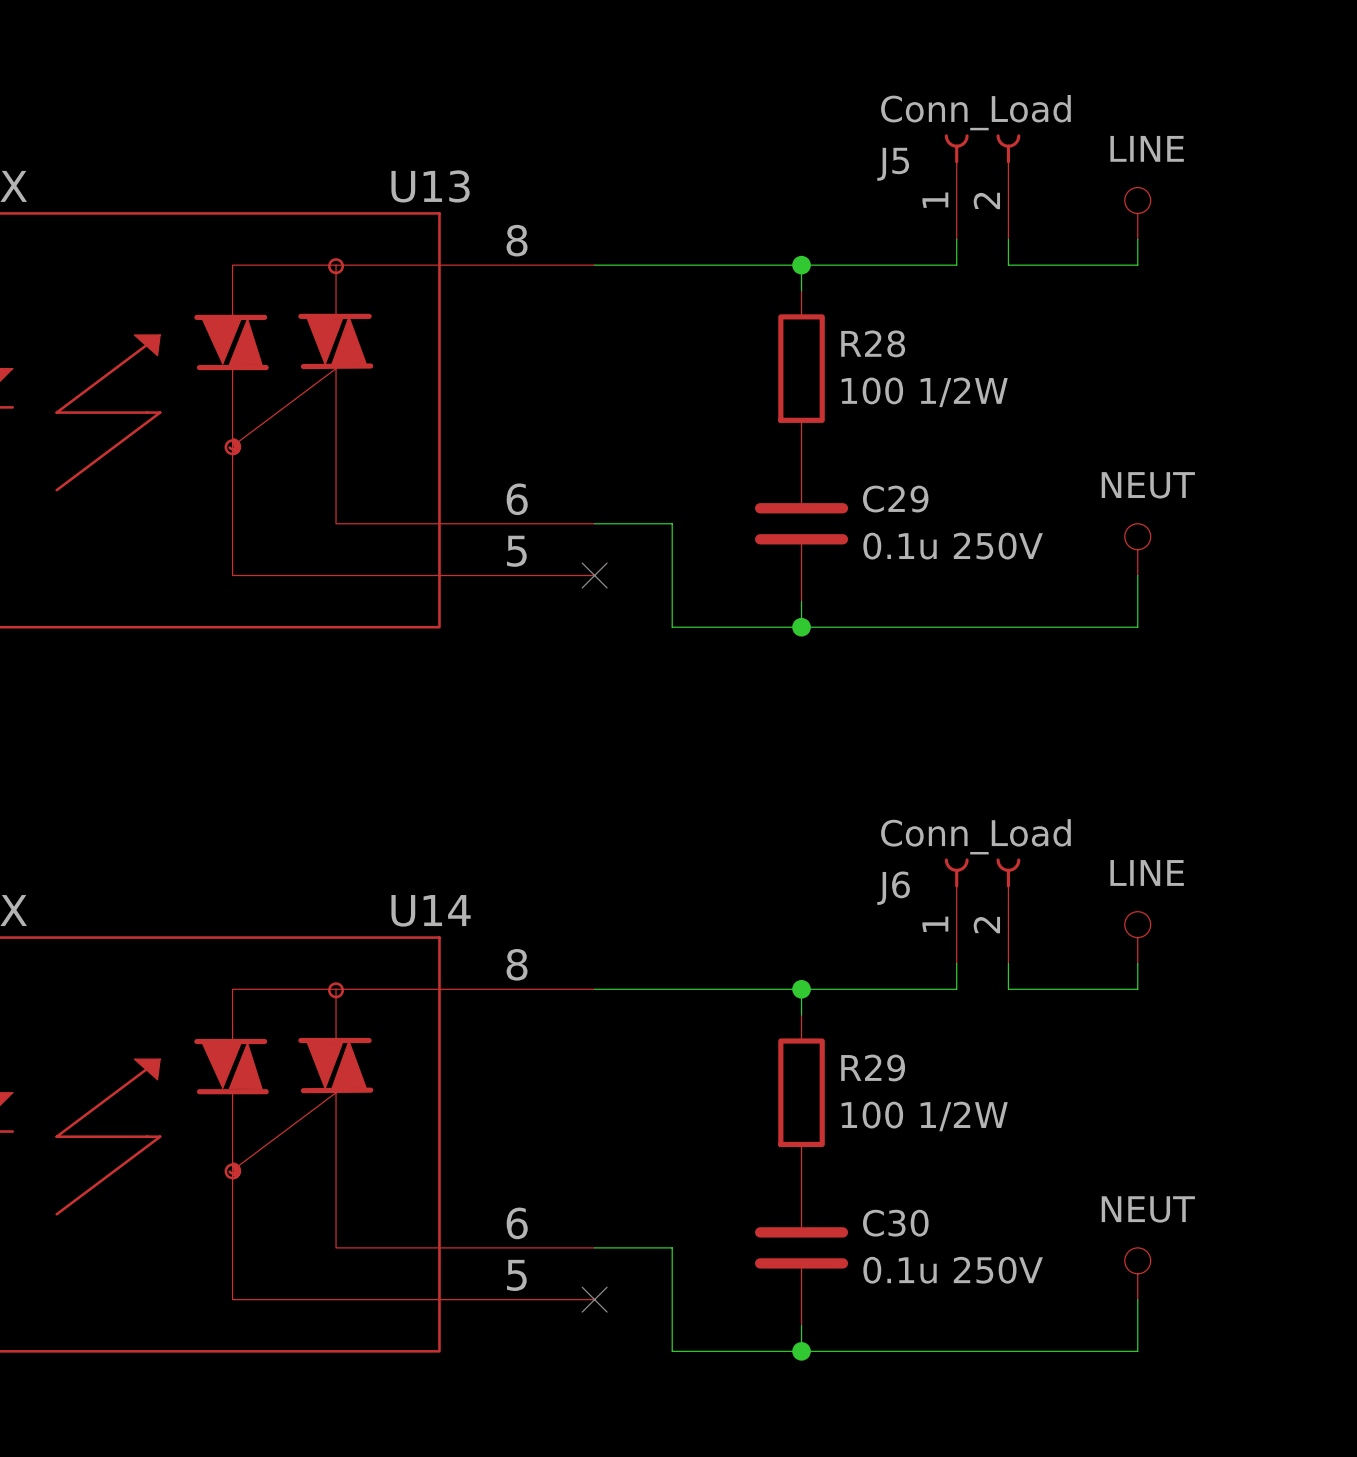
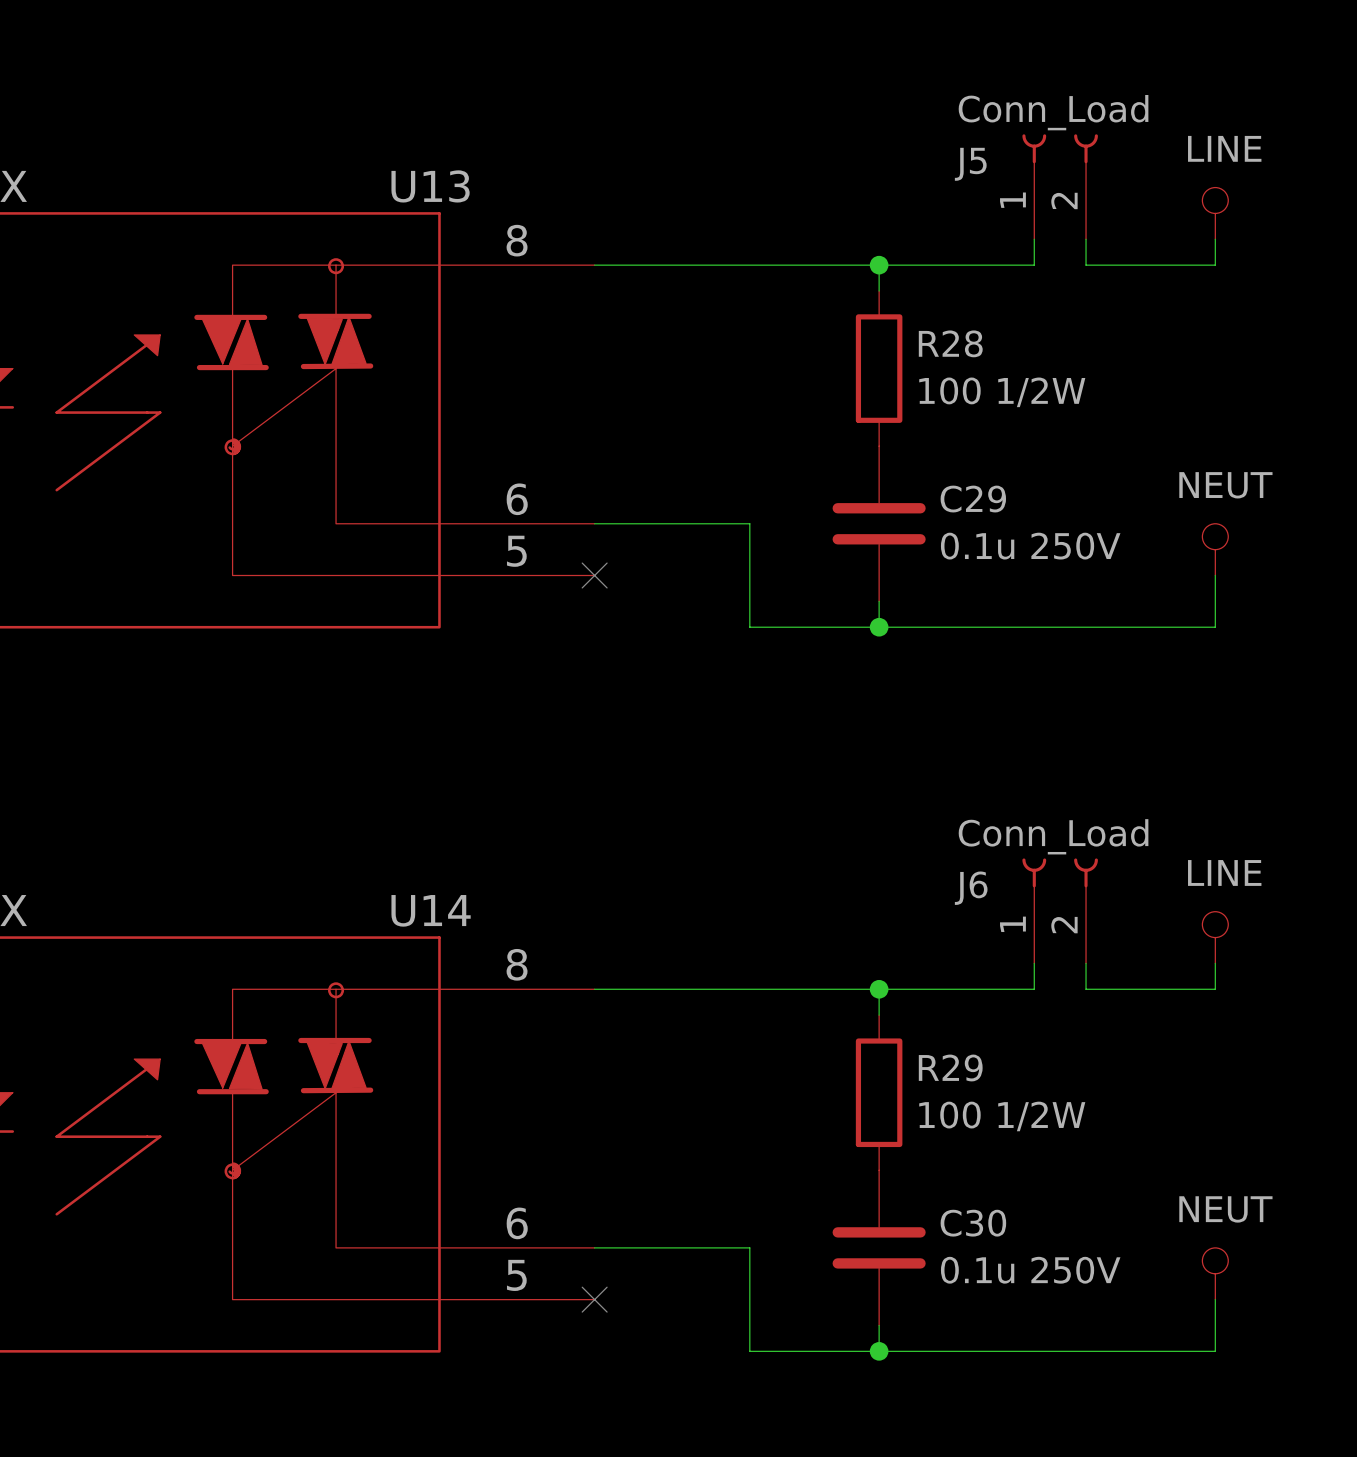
J5 position: (982, 186) -> (1060, 186)
power symbol position: LINE (1137, 213) -> LINE (1215, 213)
wire: (956, 239) (956, 265) -> (1008, 265) (956, 265)
wire: (1008, 239) (1008, 265) -> (1086, 239) (1086, 265)
wire: (1137, 239) (1137, 265) -> (1215, 239) (1215, 265) (1137, 265)
wire: (801, 265) (801, 291) -> (879, 265) (879, 291)
junction position: (801, 265) -> (879, 265)
wire: (1034, 265) (1086, 265) -> (1034, 265) (1034, 239)
R28 position: (801, 368) -> (879, 368)
wire: (672, 523) (672, 627) (749, 627) -> (672, 523) (749, 523) (749, 627)
C29 position: (801, 523) -> (879, 523)
power symbol position: NEUT (1137, 549) -> NEUT (1215, 549)
wire: (1137, 575) (1137, 627) -> (1215, 575) (1215, 627) (1137, 627)
wire: (801, 601) (801, 627) -> (879, 601) (879, 627)
junction position: (801, 627) -> (879, 627)
J6 position: (982, 910) -> (1060, 910)
power symbol position: LINE (1137, 937) -> LINE (1215, 937)
wire: (956, 963) (956, 989) -> (1008, 989) (956, 989)
wire: (1008, 963) (1008, 989) -> (1086, 963) (1086, 989)
wire: (1137, 963) (1137, 989) -> (1215, 963) (1215, 989) (1137, 989)
wire: (801, 989) (801, 1015) -> (879, 989) (879, 1015)
junction position: (801, 989) -> (879, 989)
wire: (1034, 989) (1086, 989) -> (1034, 989) (1034, 963)
R29 position: (801, 1092) -> (879, 1092)
wire: (672, 1247) (672, 1351) (749, 1351) -> (672, 1247) (749, 1247) (749, 1351)
C30 position: (801, 1247) -> (879, 1247)
power symbol position: NEUT (1137, 1273) -> NEUT (1215, 1273)
wire: (1137, 1299) (1137, 1351) -> (1215, 1299) (1215, 1351) (1137, 1351)
wire: (801, 1325) (801, 1351) -> (879, 1325) (879, 1351)
junction position: (801, 1351) -> (879, 1351)

